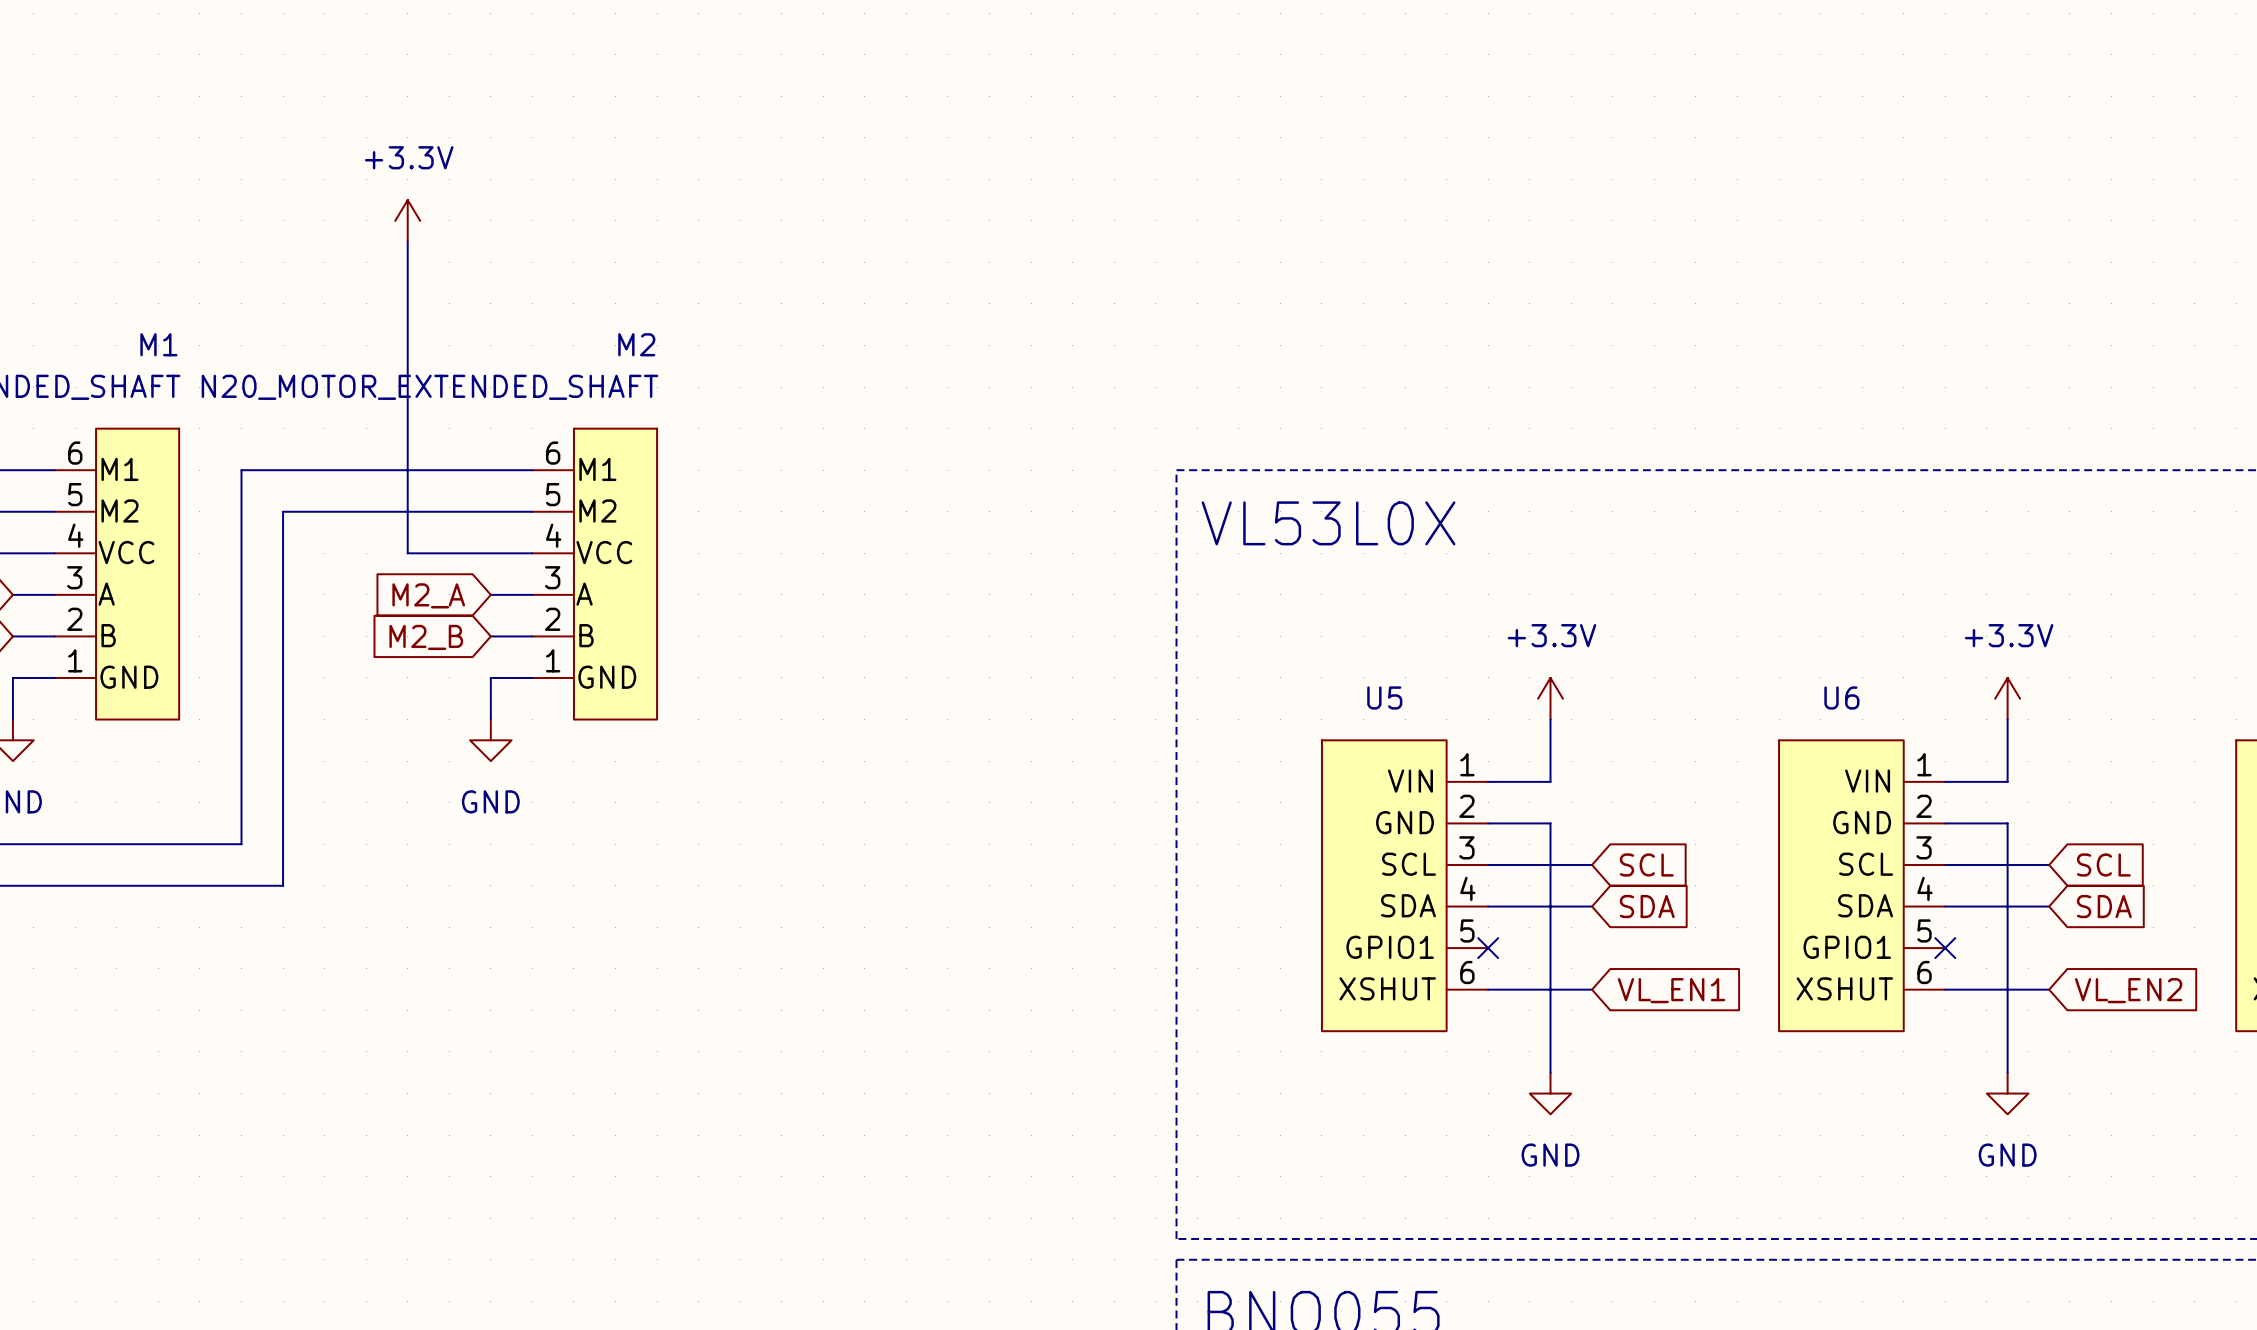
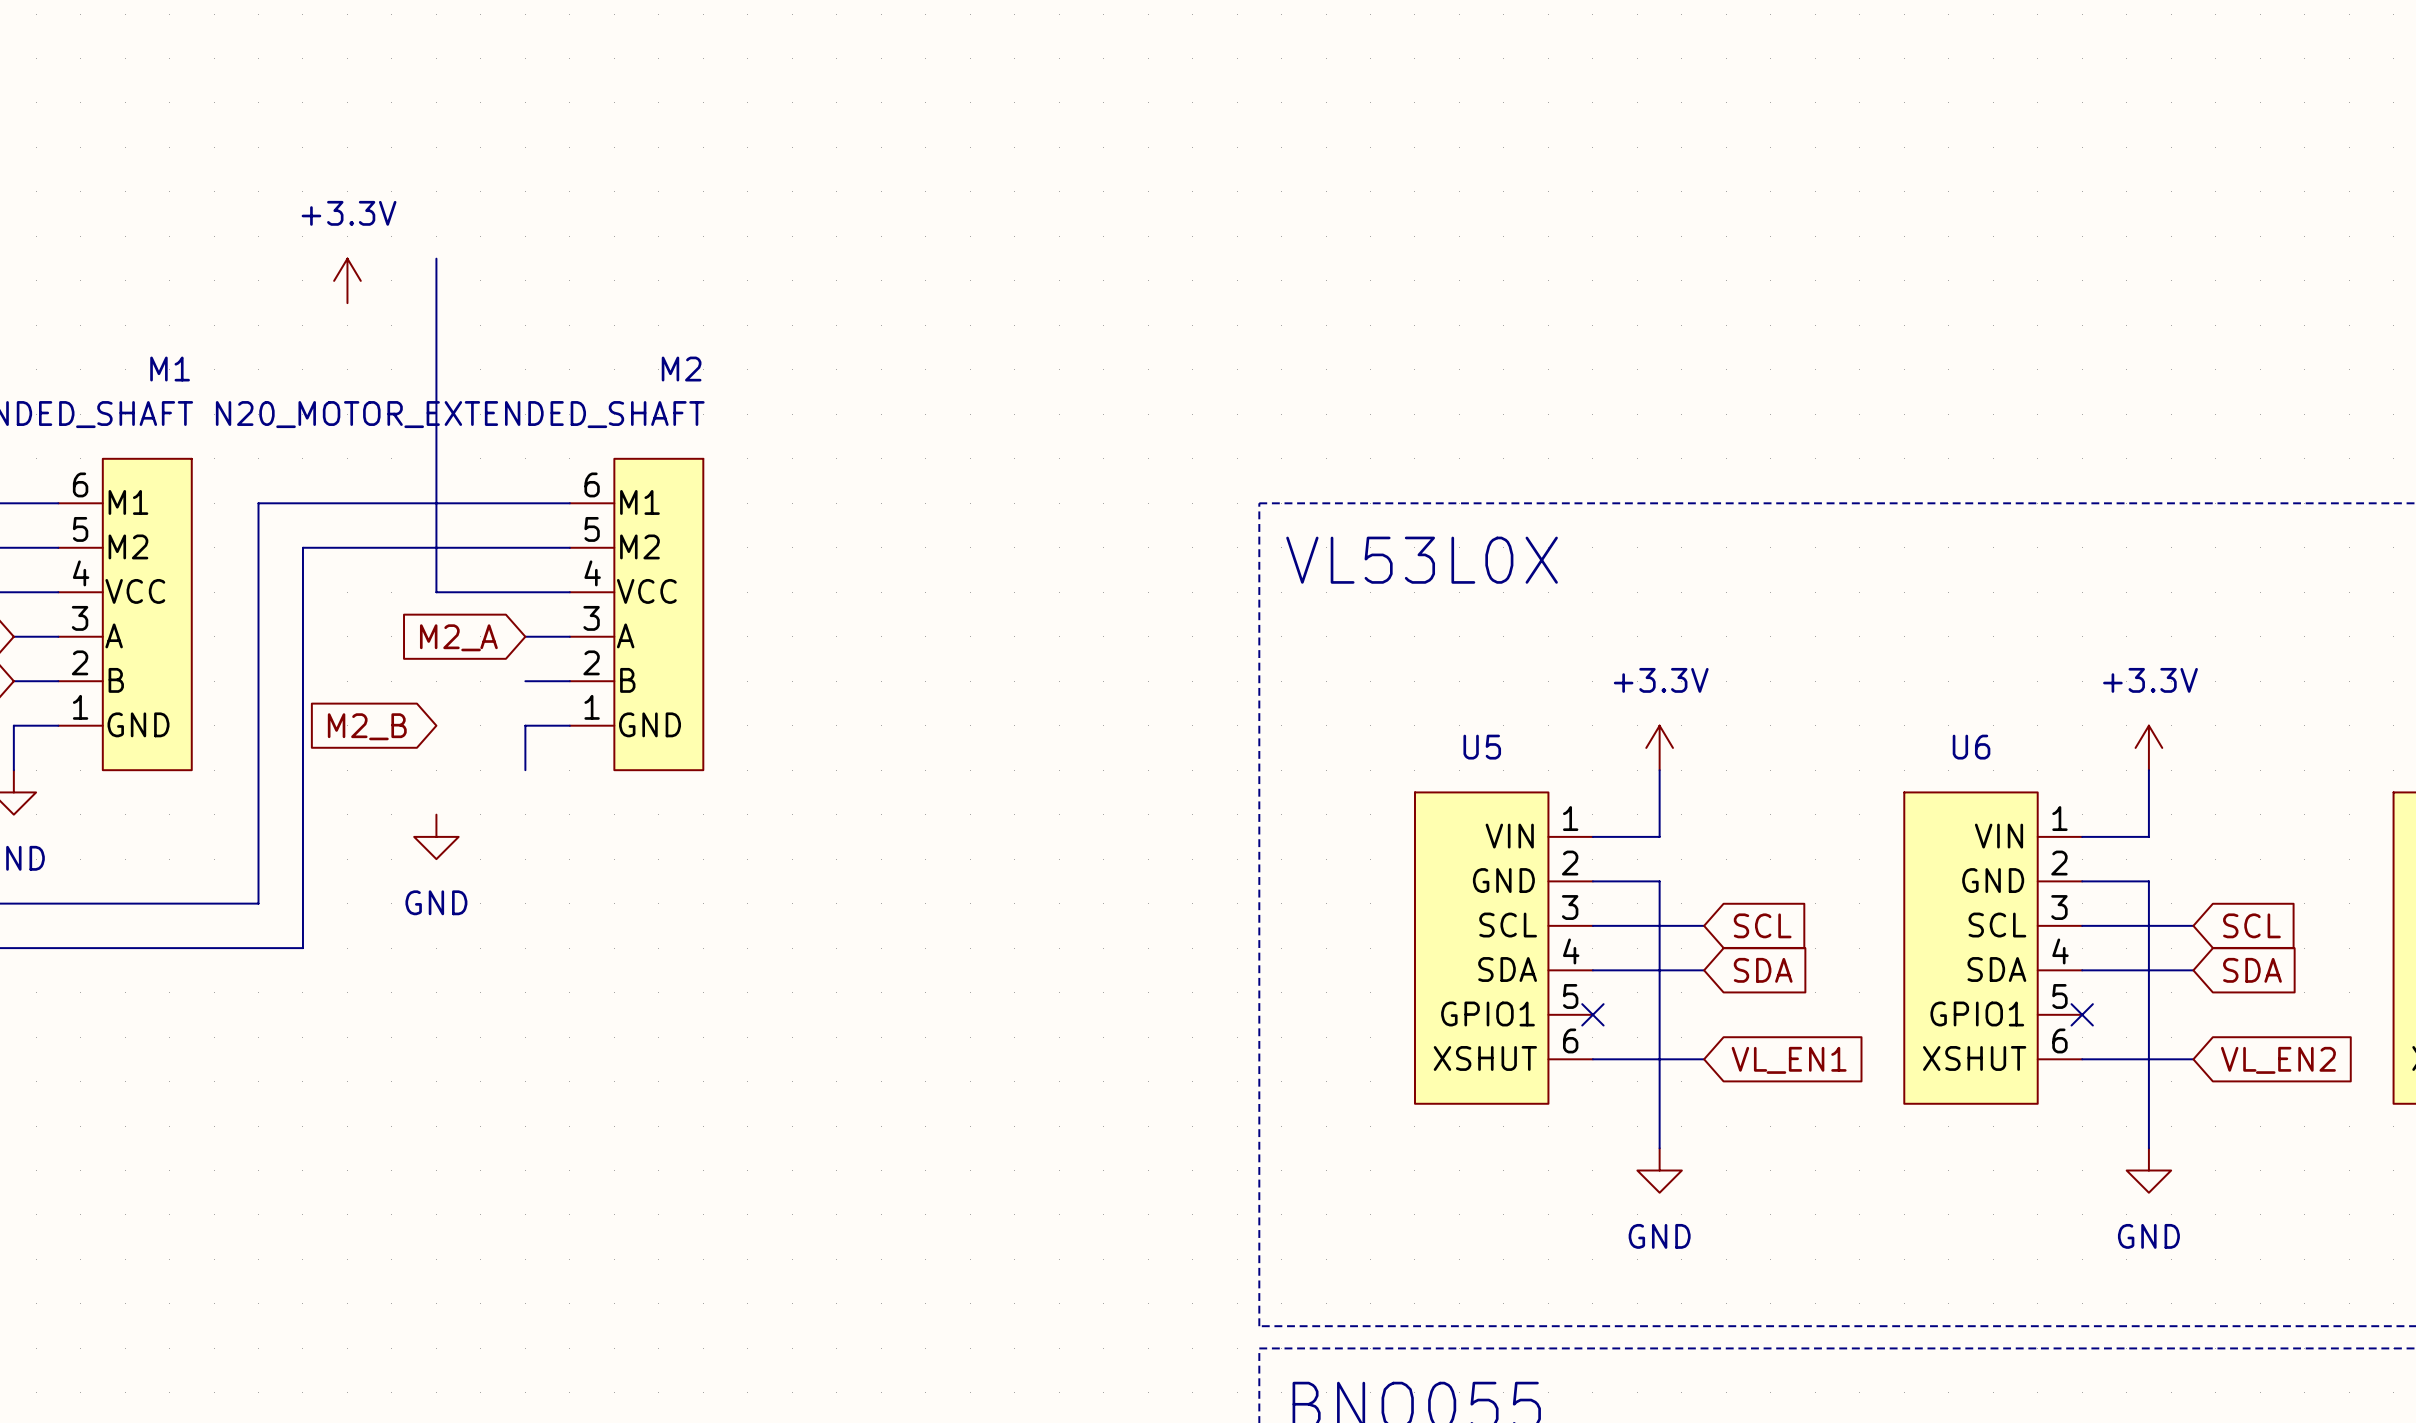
power symbol position: +3.3V (407, 220) -> +3.3V (347, 280)
global label position: M2_B (426, 637) -> M2_B (367, 726)
power symbol position: GND (490, 740) -> GND (436, 836)

